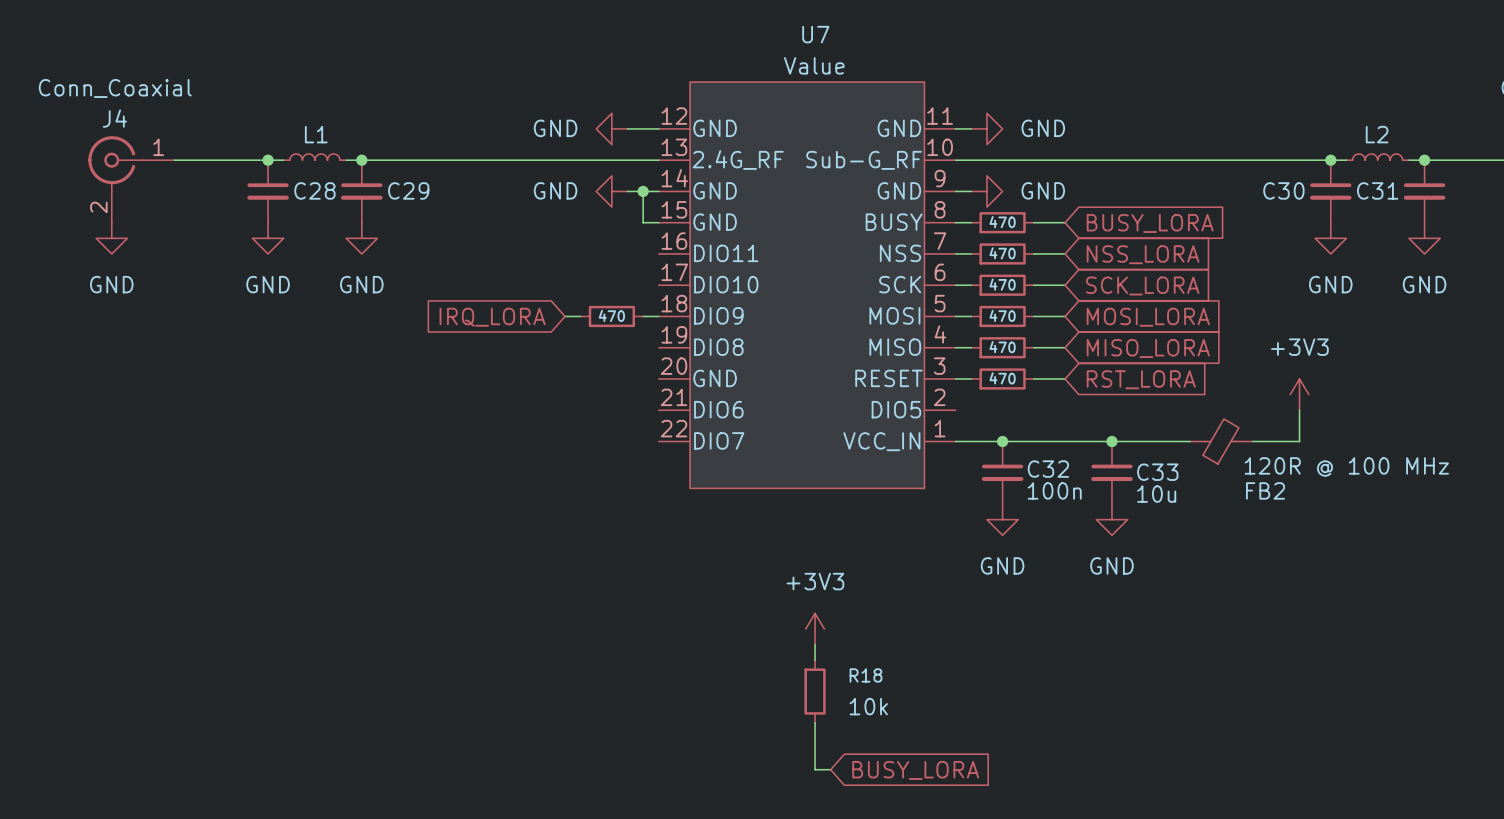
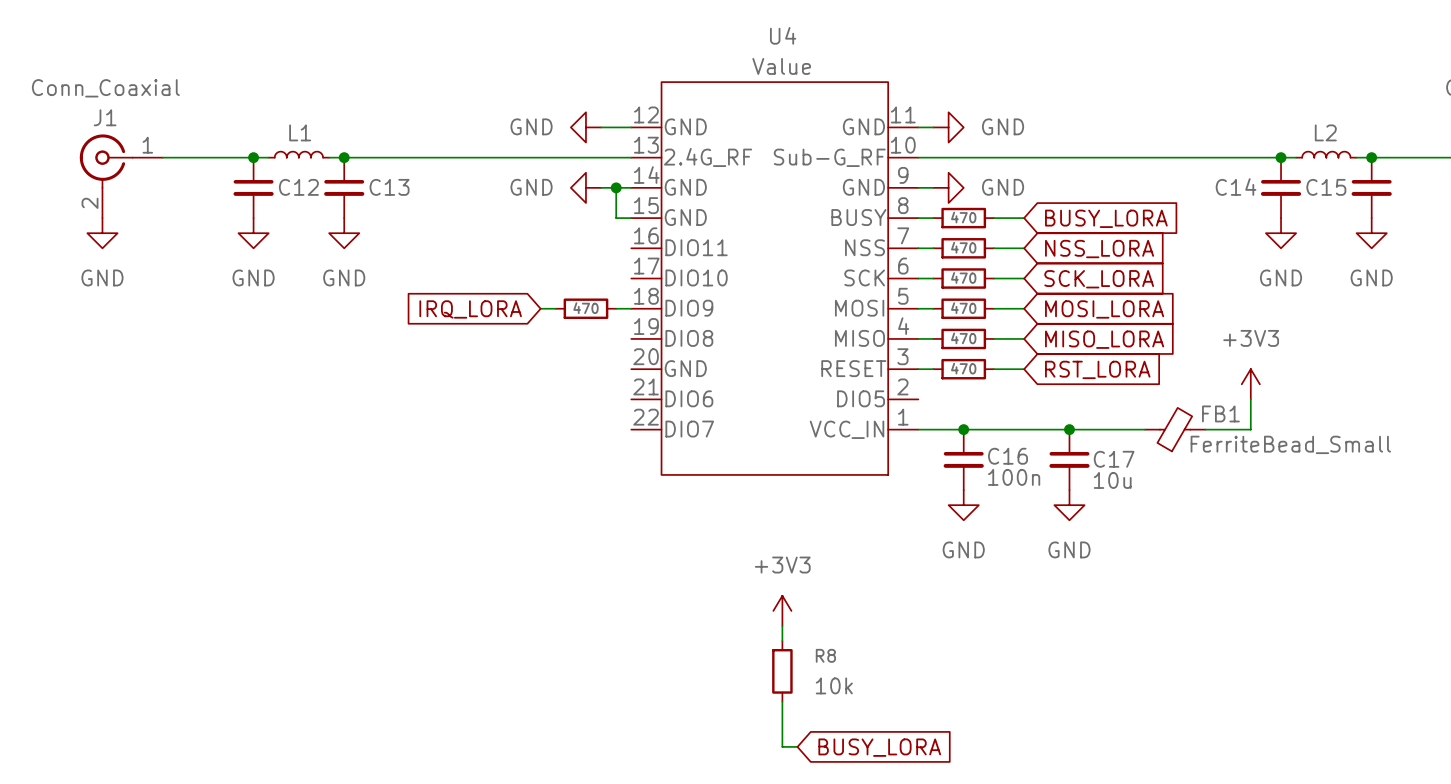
U7 name: U7 (815, 34) -> U4 (783, 35)
J4 name: J4 (114, 118) -> J1 (105, 117)
C28 name: C28 (314, 190) -> C12 (298, 187)
C29 name: C29 (408, 190) -> C13 (389, 187)
C30 name: C30 (1283, 190) -> C14 (1236, 187)
C31 name: C31 (1377, 190) -> C15 (1326, 187)
FB2 value: 120R @ 100 MHz (1346, 467) -> FerriteBead_Small (1290, 444)
C32 name: C32 (1048, 469) -> C16 (1008, 456)
C33 name: C33 (1157, 472) -> C17 (1114, 459)
FB2 name: FB2 (1265, 490) -> FB1 (1220, 413)
R18 name: R18 (865, 675) -> R8 (825, 655)

